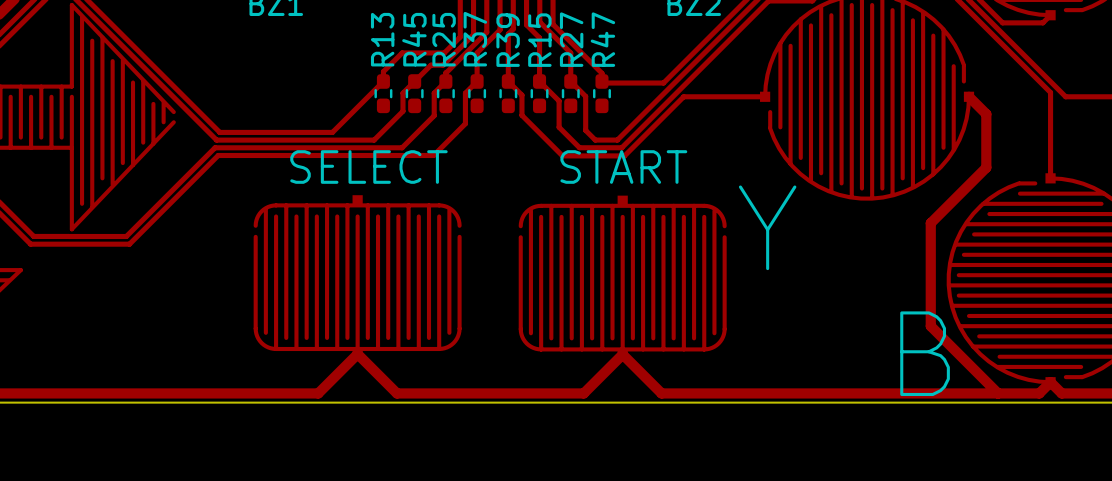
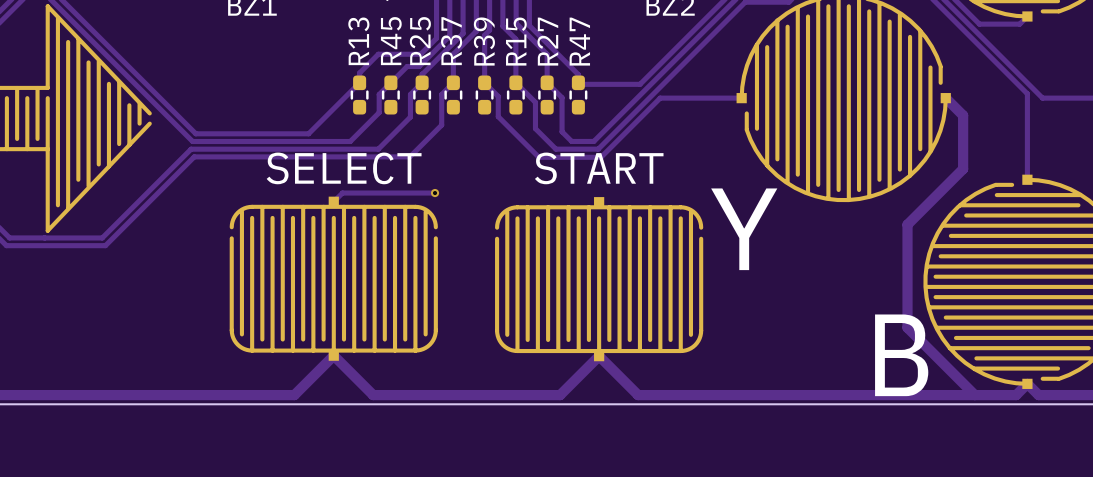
track: none -> (435, 193) (342, 193) (333, 201)
via: none -> (435, 193)

